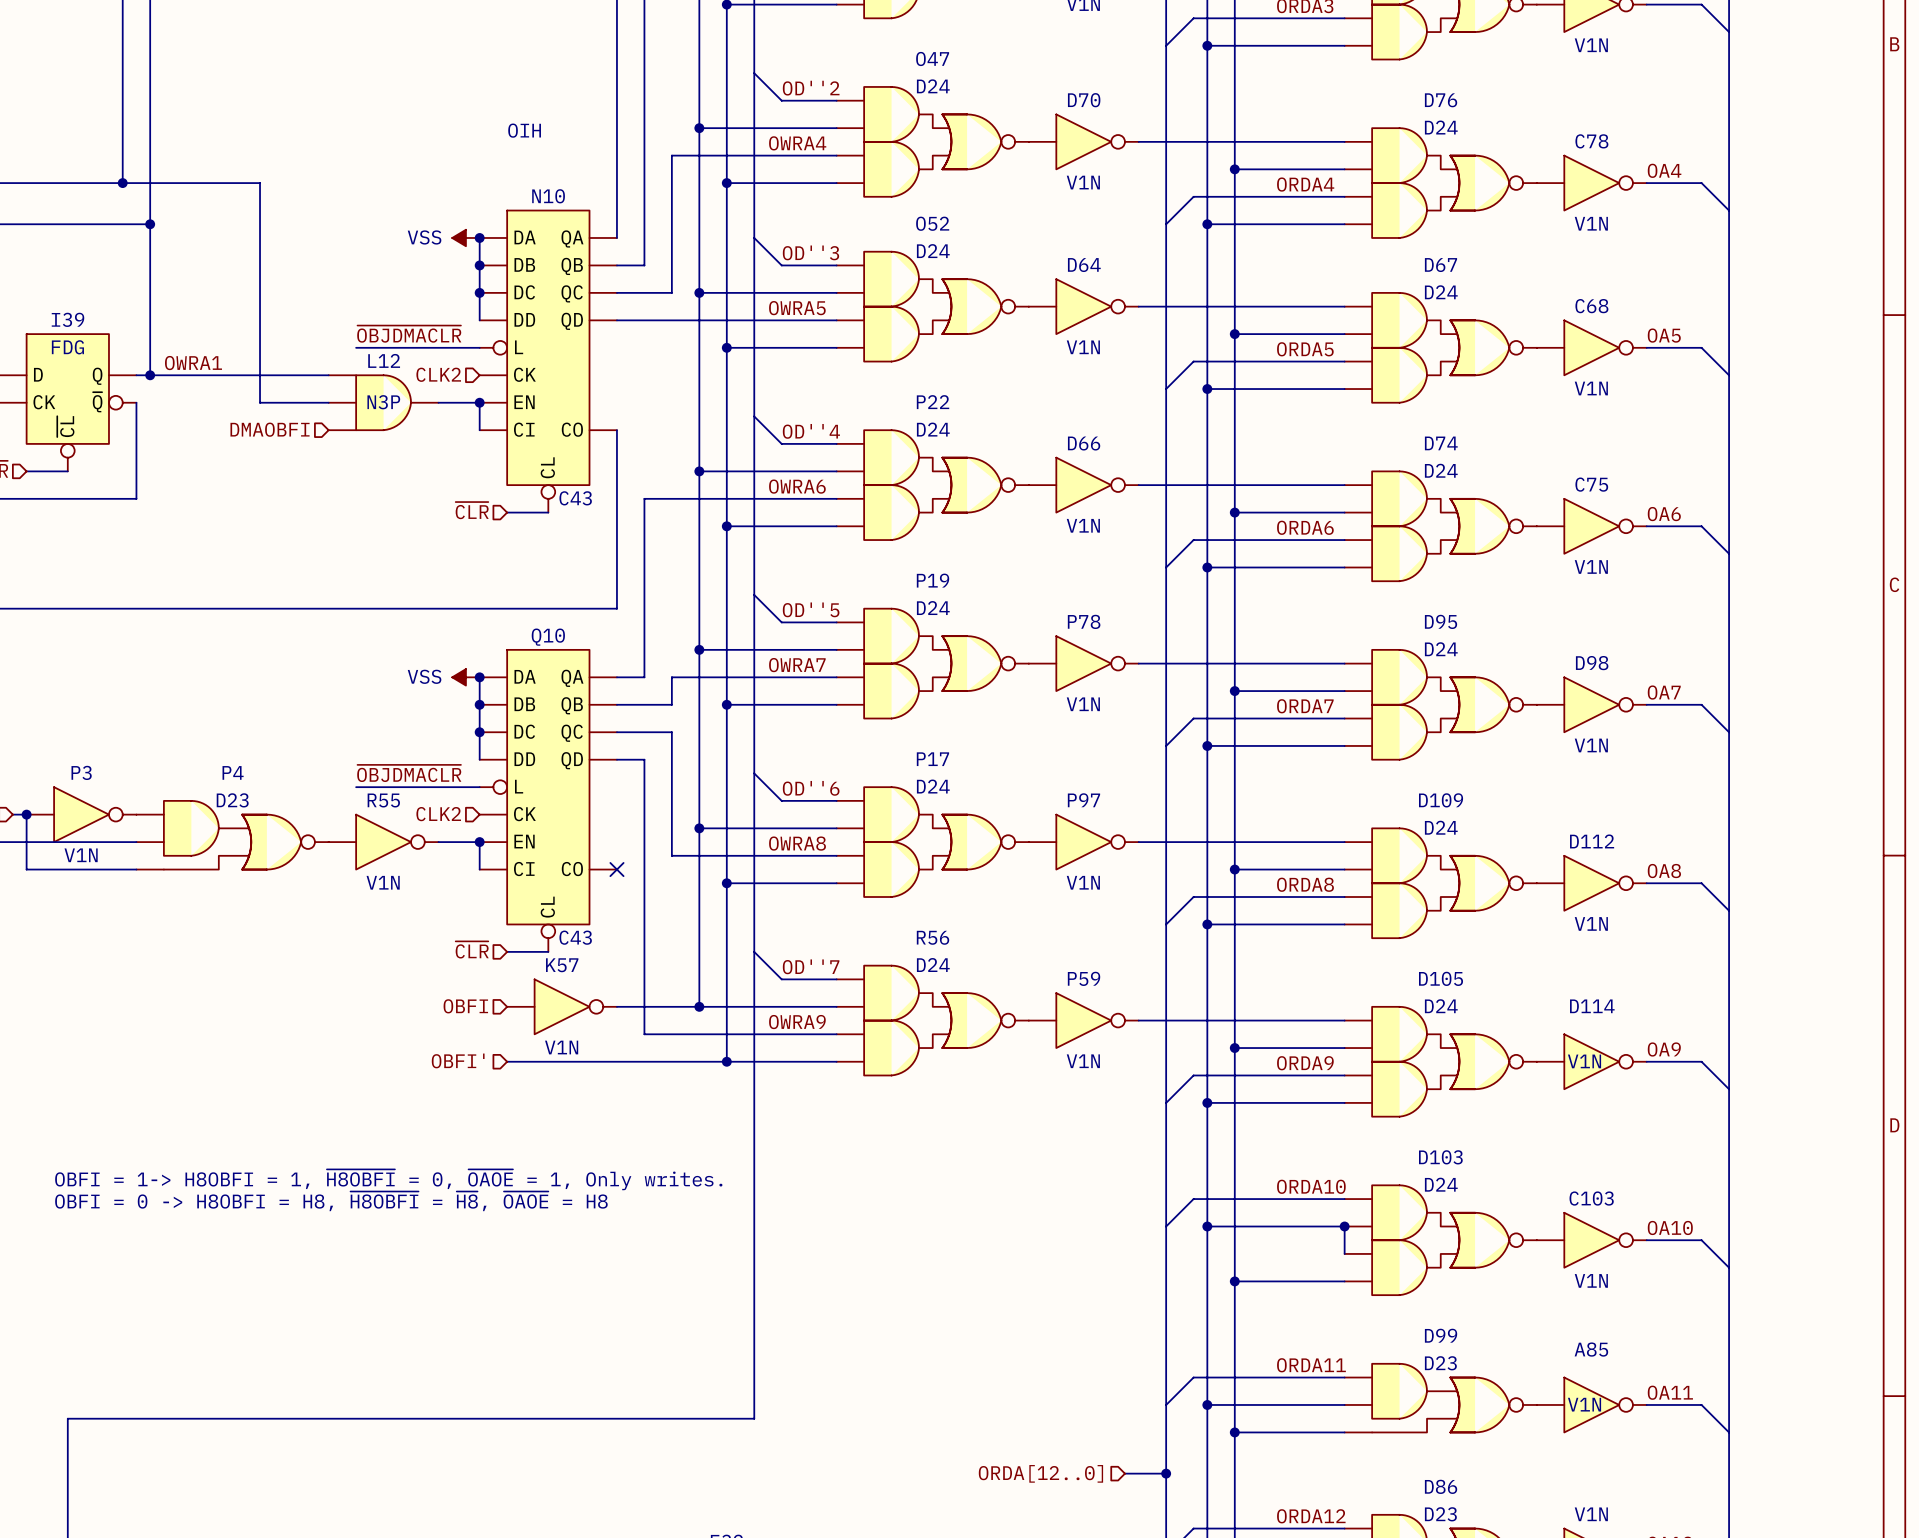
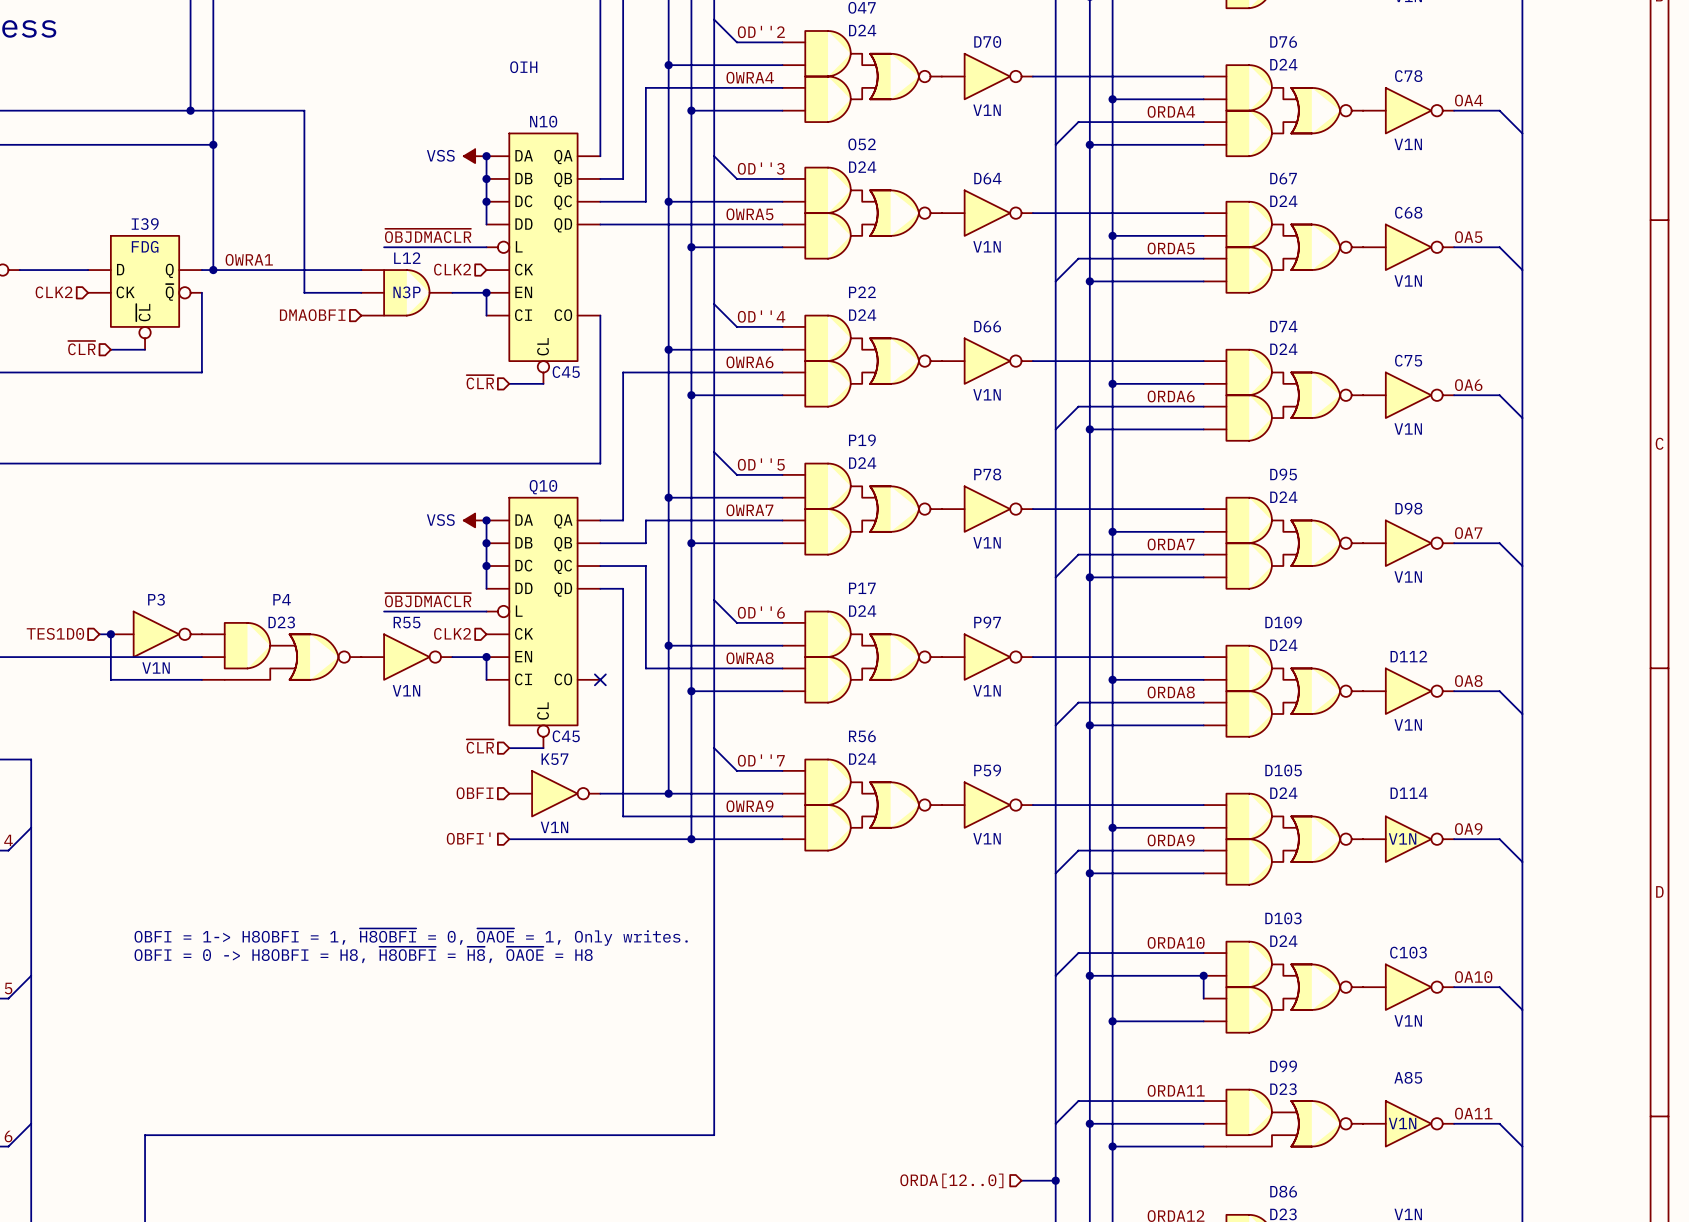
N10 value: C43 (575, 498) -> C45 (566, 372)
Q10 value: C43 (575, 937) -> C45 (566, 736)

